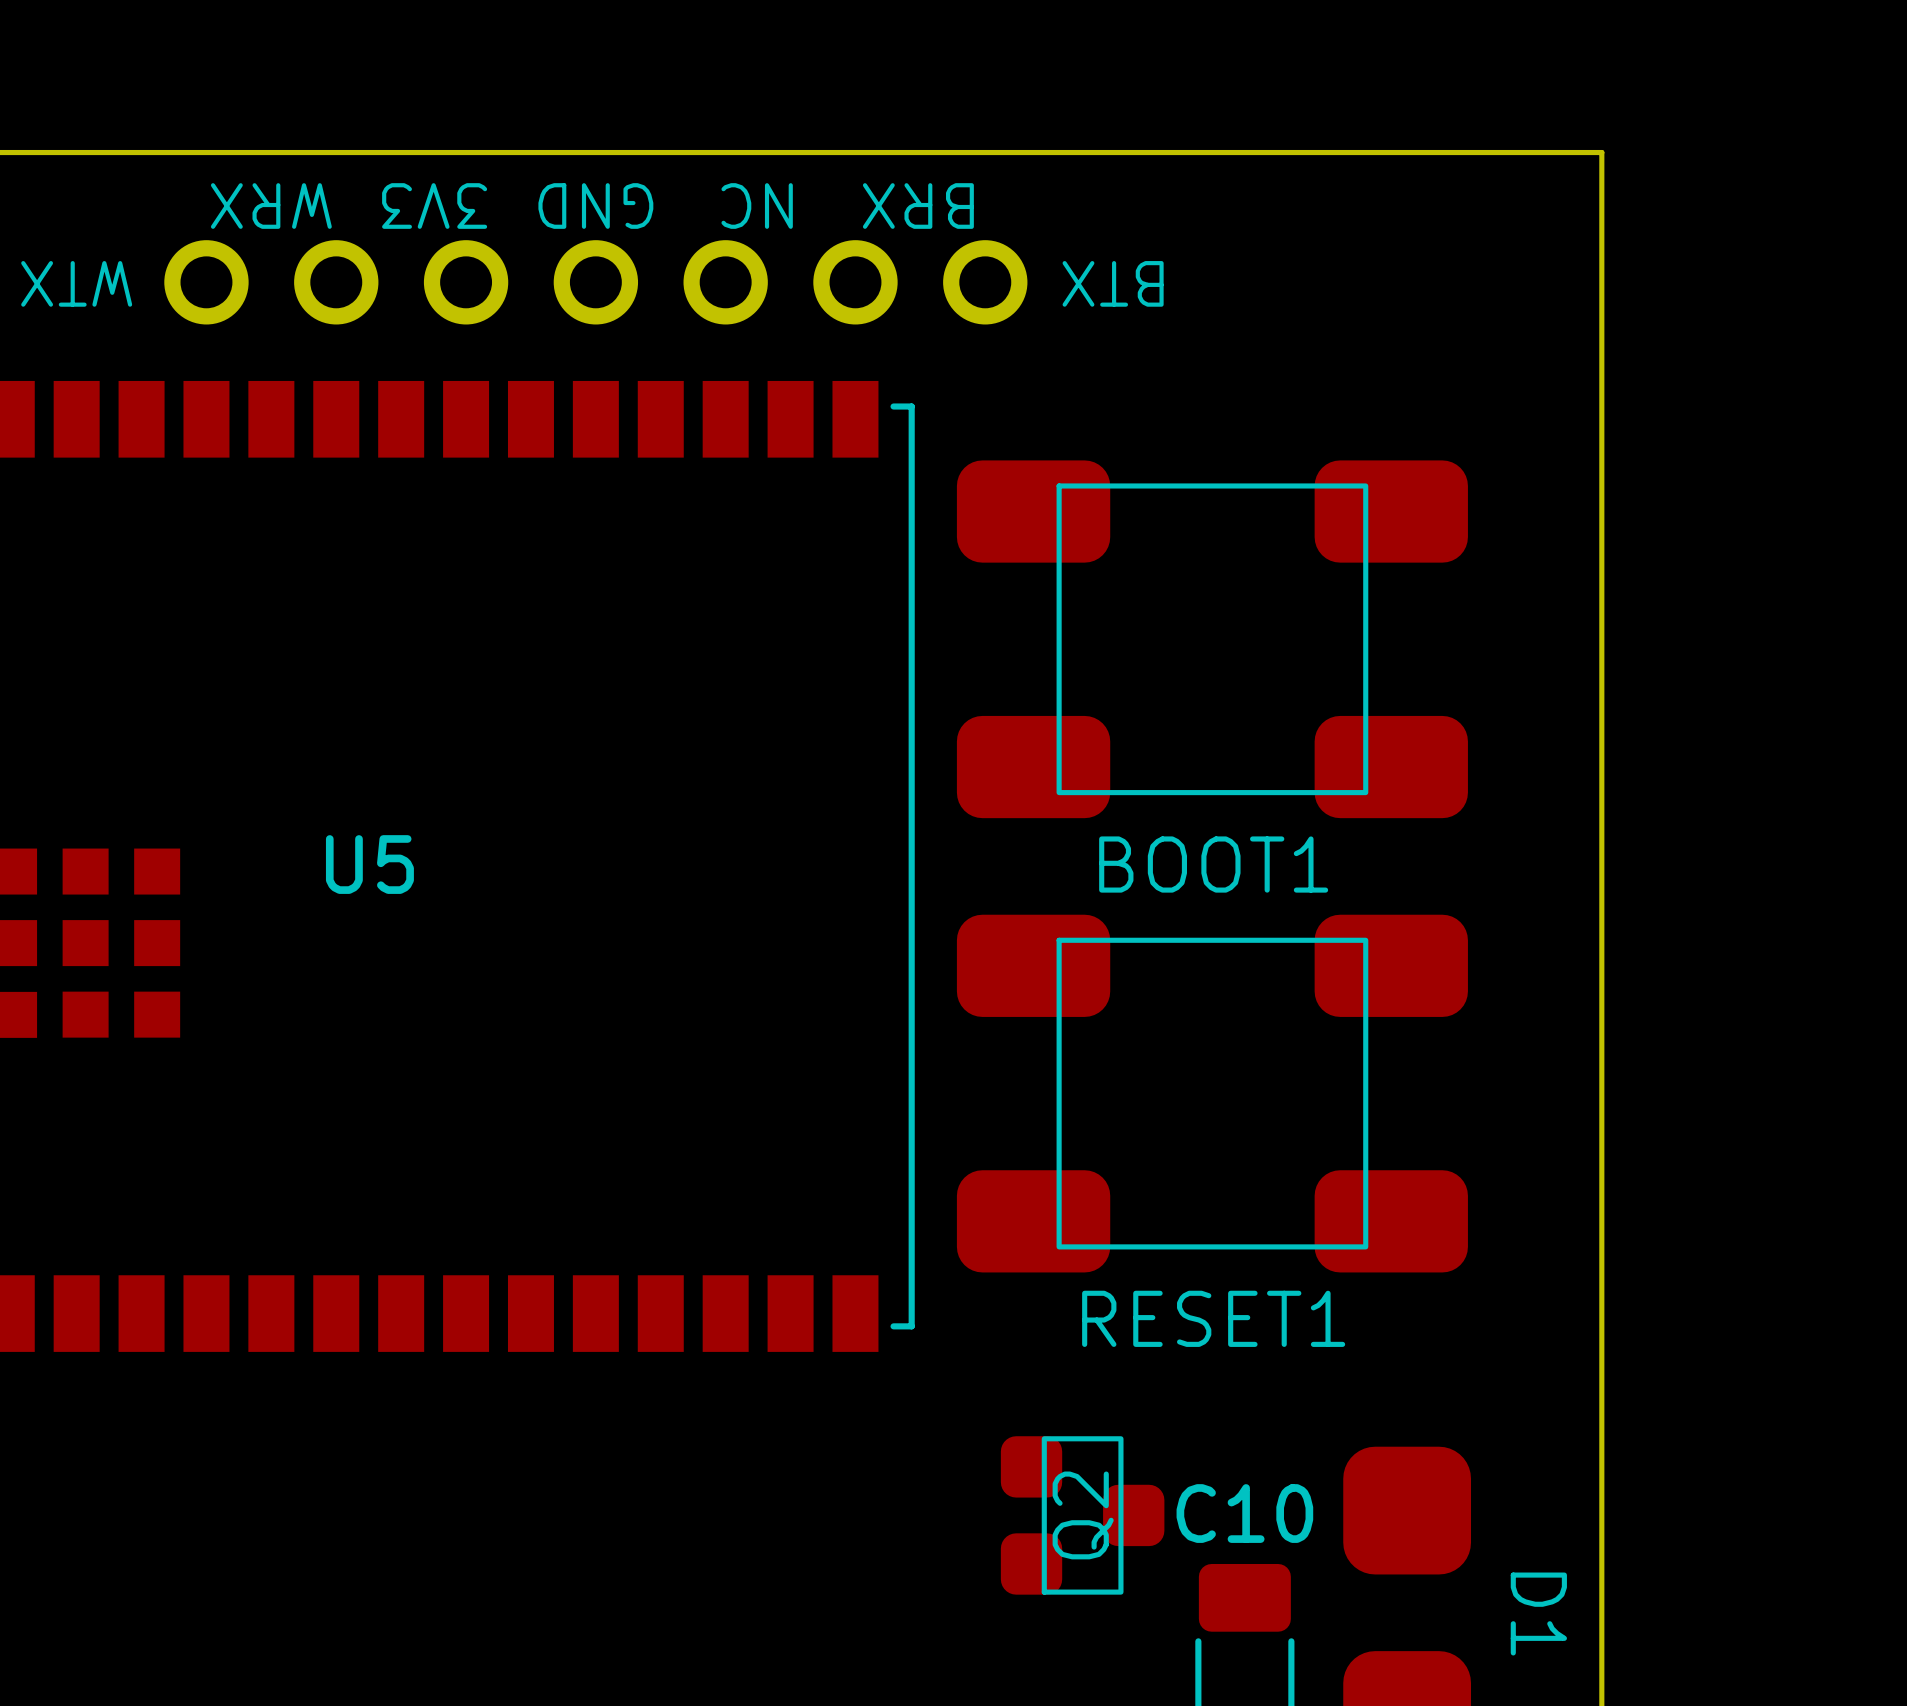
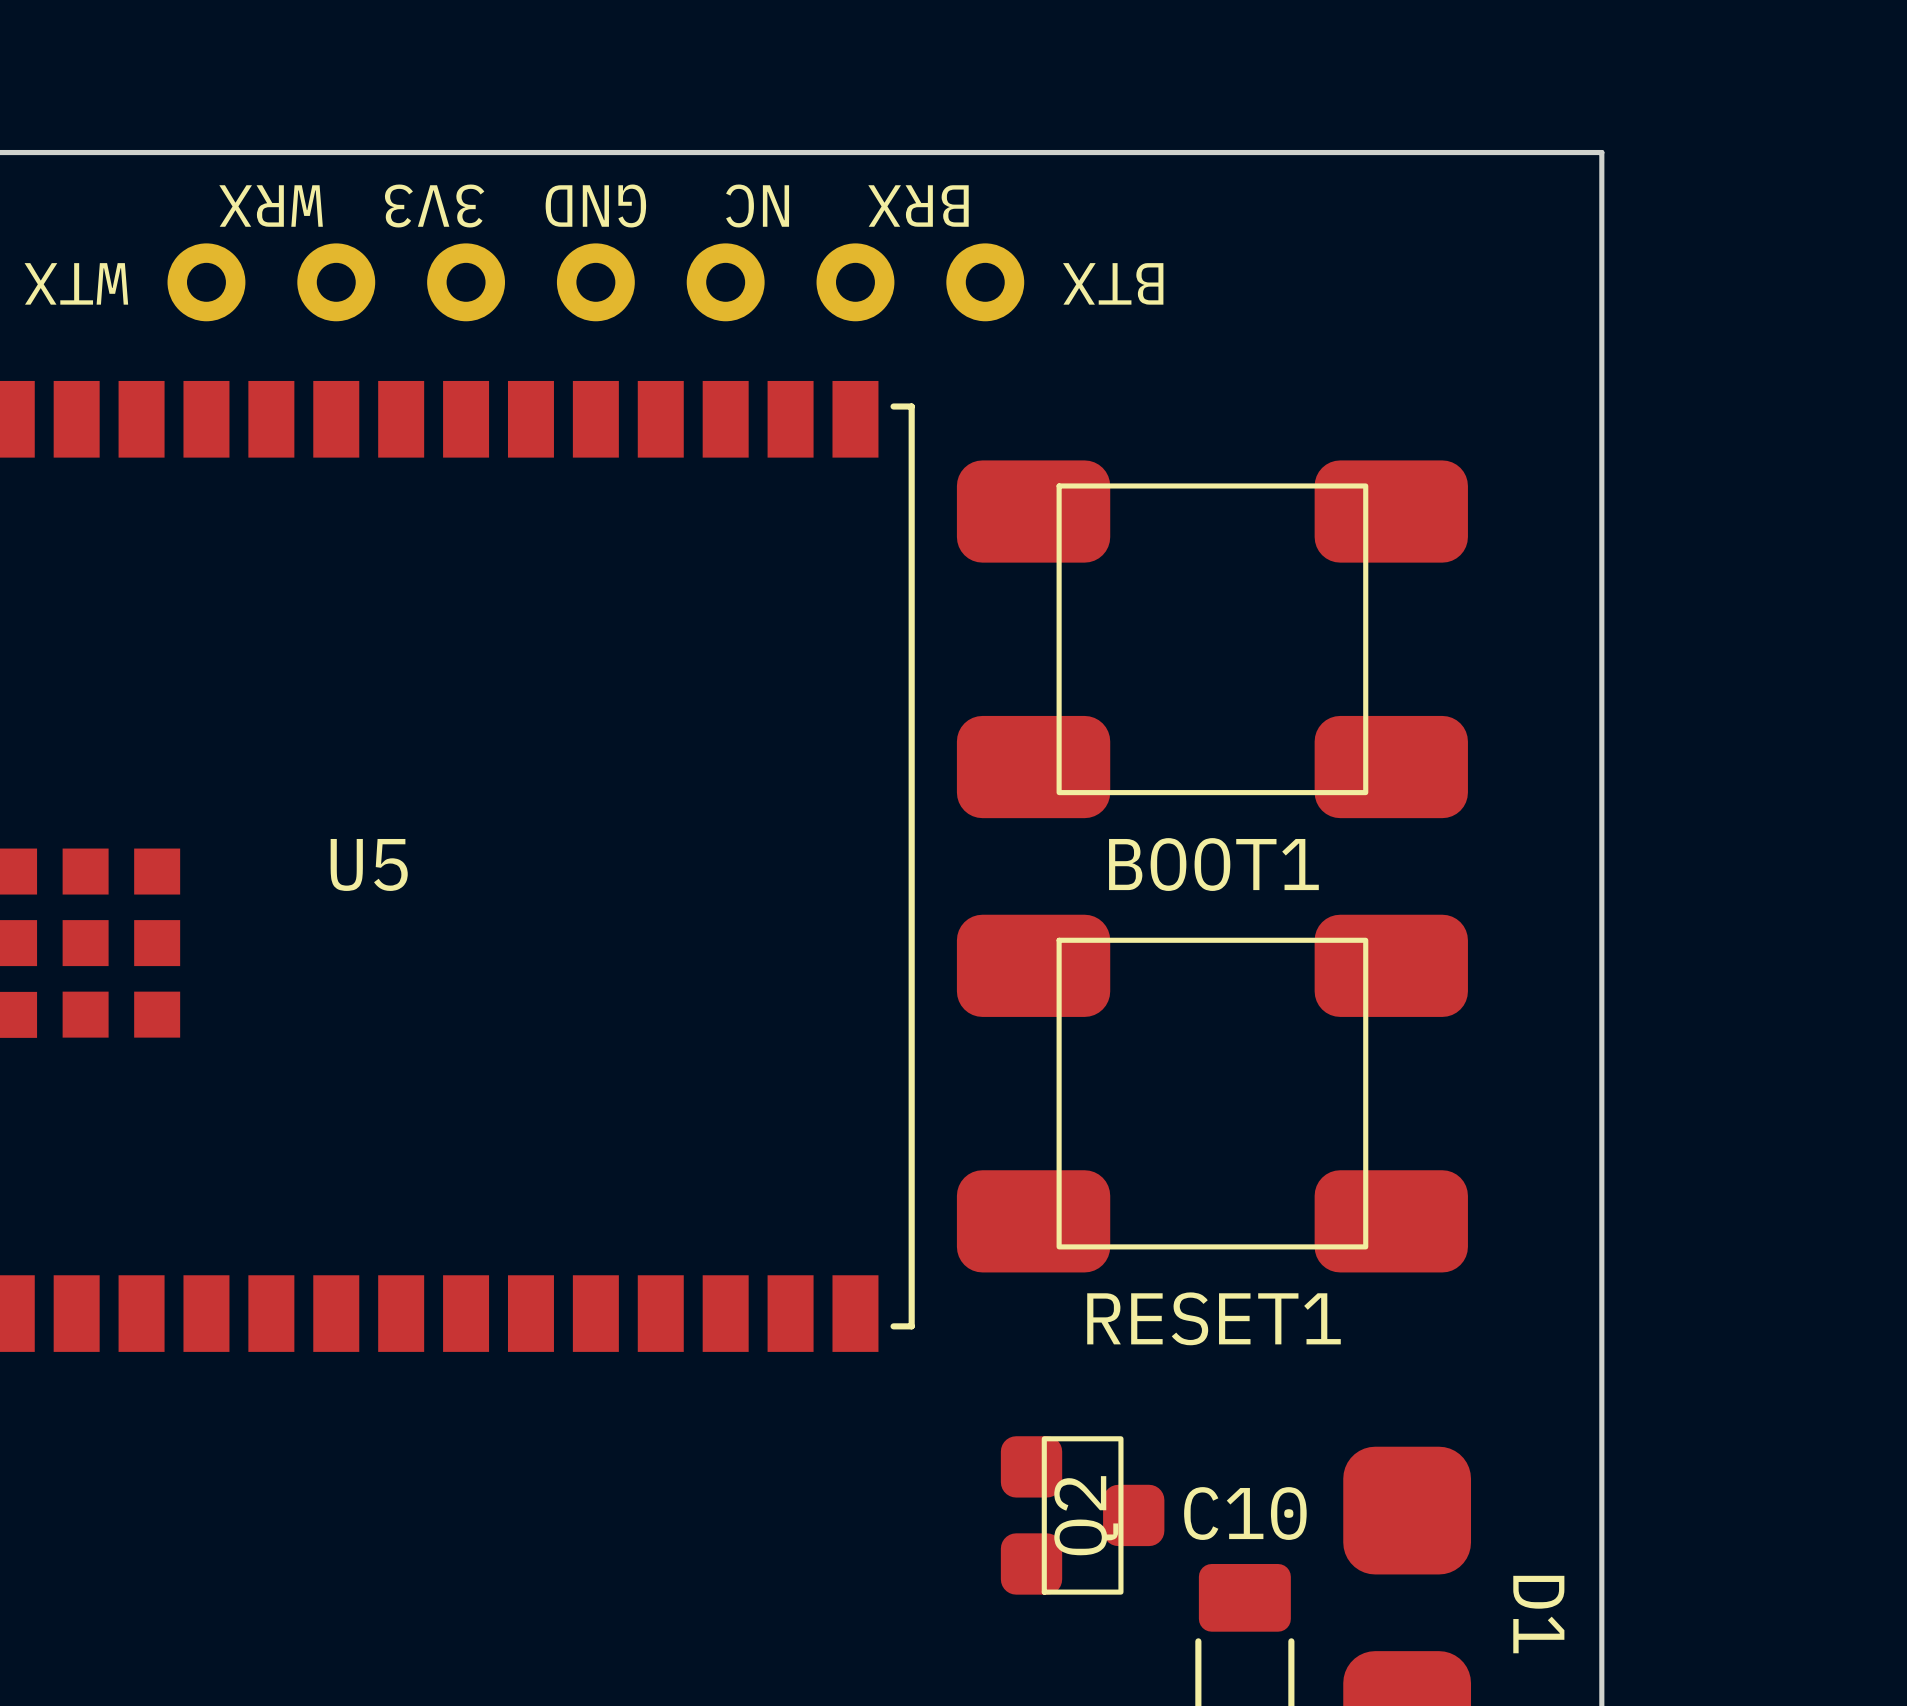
part footprint: [164, 240, 1028, 325] -> [167, 243, 1025, 322]

